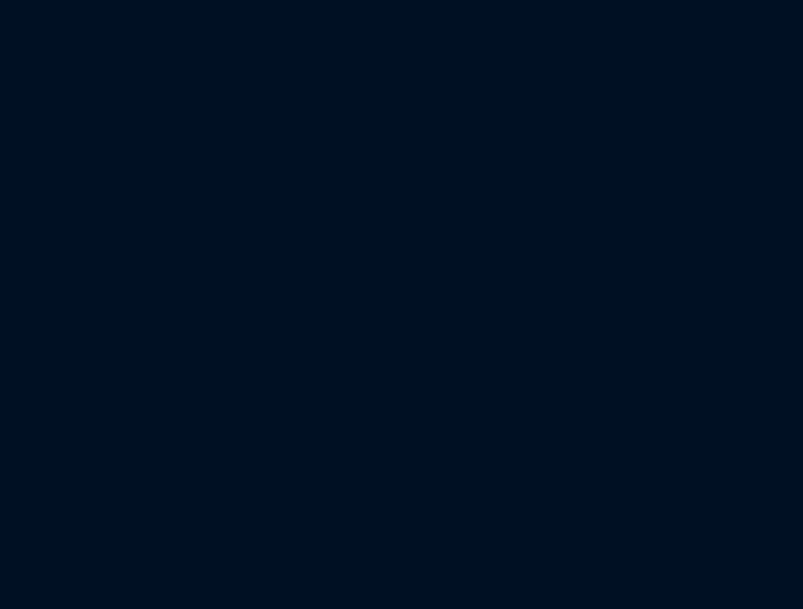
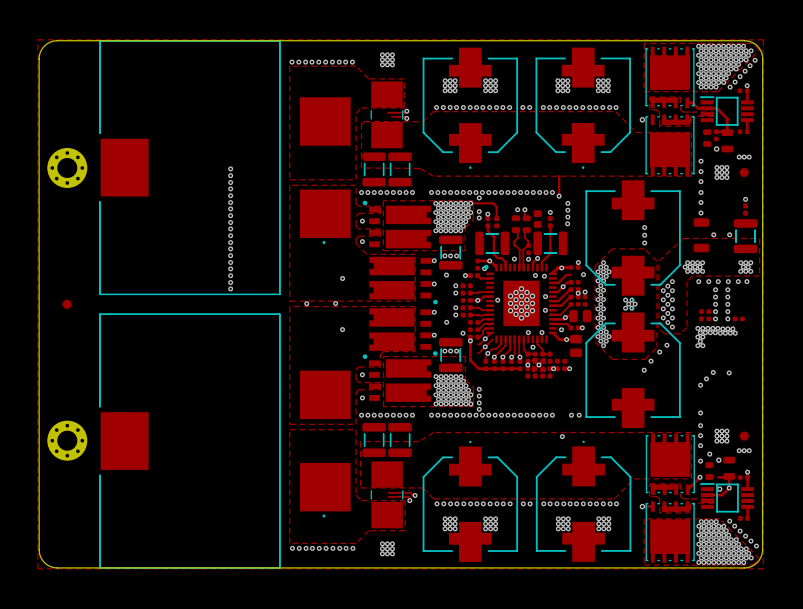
zone outline: none -> (37, 39) (37, 568) (763, 568) (763, 39) (37, 39)
board edge: none -> (57, 40) (744, 40) (755, 44) (760, 51) (762, 58) (762, 549) (758, 561) (752, 566) (744, 567) (57, 567) (46, 563) (40, 557) (39, 549) (39, 58) (44, 46) (57, 40)
zone outline: none -> (644, 43) (644, 91) (717, 91) (759, 49) (752, 43) (644, 43)
via: none -> (698, 46)
via: none -> (703, 46)
via: none -> (708, 46)
via: none -> (713, 46)
via: none -> (718, 46)
via: none -> (723, 46)
via: none -> (728, 46)
via: none -> (733, 46)
via: none -> (738, 46)
via: none -> (743, 46)
via: none -> (701, 50)
via: none -> (706, 50)
via: none -> (711, 50)
via: none -> (716, 50)
via: none -> (721, 50)
via: none -> (726, 50)
via: none -> (731, 50)
via: none -> (736, 50)
via: none -> (741, 50)
via: none -> (746, 50)
via: none -> (751, 50)
via: none -> (382, 54)
via: none -> (387, 54)
via: none -> (392, 54)
via: none -> (698, 55)
via: none -> (703, 55)
via: none -> (708, 55)
via: none -> (713, 55)
via: none -> (718, 55)
via: none -> (723, 55)
via: none -> (728, 55)
via: none -> (733, 55)
via: none -> (738, 55)
via: none -> (743, 55)
via: none -> (748, 55)
via: none -> (382, 59)
via: none -> (387, 59)
via: none -> (392, 59)
via: none -> (701, 59)
via: none -> (706, 59)
via: none -> (711, 59)
via: none -> (716, 59)
via: none -> (721, 59)
via: none -> (726, 59)
via: none -> (731, 59)
via: none -> (736, 59)
via: none -> (741, 59)
via: none -> (746, 59)
via: none -> (755, 60)
via: none -> (292, 62)
via: none -> (298, 62)
via: none -> (305, 62)
via: none -> (311, 62)
via: none -> (318, 62)
via: none -> (325, 62)
via: none -> (332, 62)
via: none -> (339, 62)
via: none -> (345, 62)
via: none -> (352, 62)
via: none -> (382, 64)
via: none -> (387, 64)
via: none -> (392, 64)
via: none -> (698, 64)
via: none -> (703, 64)
via: none -> (708, 64)
via: none -> (713, 64)
via: none -> (718, 64)
via: none -> (723, 64)
via: none -> (728, 64)
via: none -> (733, 64)
via: none -> (738, 64)
via: none -> (750, 65)
zone outline: none -> (289, 66) (289, 179) (356, 179) (356, 113) (361, 108) (404, 108) (404, 78) (368, 78) (356, 66) (289, 66)
via: none -> (701, 69)
via: none -> (706, 69)
via: none -> (711, 69)
via: none -> (716, 69)
via: none -> (721, 69)
via: none -> (726, 69)
via: none -> (731, 69)
via: none -> (736, 69)
via: none -> (745, 71)
via: none -> (698, 73)
via: none -> (703, 73)
via: none -> (708, 73)
via: none -> (713, 73)
via: none -> (718, 73)
via: none -> (723, 73)
via: none -> (728, 73)
via: none -> (740, 76)
part: none -> (669, 77)
via: none -> (701, 78)
via: none -> (706, 78)
via: none -> (711, 78)
via: none -> (716, 78)
via: none -> (721, 78)
via: none -> (726, 78)
via: none -> (445, 80)
via: none -> (450, 80)
via: none -> (455, 80)
via: none -> (485, 80)
via: none -> (490, 80)
via: none -> (495, 80)
via: none -> (557, 80)
via: none -> (562, 80)
via: none -> (567, 80)
via: none -> (598, 80)
via: none -> (603, 80)
via: none -> (608, 80)
via: none -> (698, 82)
via: none -> (703, 82)
via: none -> (708, 82)
via: none -> (713, 82)
via: none -> (718, 82)
via: none -> (723, 82)
via: none -> (735, 82)
via: none -> (445, 85)
via: none -> (450, 85)
via: none -> (455, 85)
via: none -> (485, 85)
via: none -> (490, 85)
via: none -> (495, 85)
via: none -> (557, 85)
via: none -> (562, 85)
via: none -> (567, 85)
via: none -> (598, 85)
via: none -> (603, 85)
via: none -> (608, 85)
via: none -> (747, 85)
via: none -> (701, 87)
via: none -> (706, 87)
via: none -> (711, 87)
via: none -> (716, 87)
via: none -> (730, 87)
via: none -> (445, 90)
via: none -> (450, 90)
via: none -> (455, 90)
via: none -> (485, 90)
via: none -> (490, 90)
via: none -> (495, 90)
via: none -> (557, 90)
via: none -> (562, 90)
via: none -> (567, 90)
via: none -> (598, 90)
via: none -> (603, 90)
via: none -> (608, 90)
part: none -> (743, 90)
track: none -> (747, 90) (747, 102)
zone outline: none -> (649, 97) (680, 97) (680, 109) (683, 112) (713, 112) (713, 116) (691, 116) (690, 126) (659, 126) (659, 112) (656, 109) (649, 109) (649, 97)
track: none -> (687, 102) (692, 102) (698, 108) (716, 108) (727, 118) (727, 132) (716, 131)
via: none -> (436, 107)
via: none -> (443, 107)
via: none -> (450, 107)
via: none -> (456, 107)
via: none -> (463, 107)
via: none -> (470, 107)
via: none -> (476, 107)
via: none -> (482, 107)
via: none -> (489, 107)
via: none -> (496, 107)
via: none -> (502, 107)
via: none -> (509, 107)
via: none -> (522, 107)
via: none -> (529, 107)
via: none -> (543, 107)
via: none -> (549, 107)
via: none -> (556, 107)
via: none -> (563, 107)
via: none -> (569, 107)
via: none -> (576, 107)
via: none -> (582, 107)
via: none -> (589, 107)
via: none -> (596, 107)
via: none -> (602, 107)
via: none -> (609, 107)
via: none -> (616, 107)
part: none -> (470, 108)
part: none -> (583, 108)
track: none -> (406, 111) (391, 112)
via: none -> (406, 111)
zone outline: none -> (433, 111) (423, 121) (364, 121) (361, 124) (361, 167) (419, 168) (433, 176) (691, 176) (691, 132) (636, 132) (615, 111) (433, 111)
part: none -> (726, 111)
part: none -> (390, 112)
part: none -> (386, 114)
track: none -> (391, 116) (406, 118)
via: none -> (406, 118)
via: none -> (642, 119)
track: none -> (747, 120) (747, 131)
part: none -> (743, 131)
part: none -> (716, 135)
part: none -> (707, 138)
part: none -> (727, 140)
part: none -> (669, 145)
via: none -> (716, 148)
via: none -> (739, 157)
via: none -> (744, 157)
via: none -> (749, 157)
via: none -> (701, 161)
part: none -> (67, 167)
part: none -> (225, 167)
via: none -> (716, 167)
via: none -> (721, 167)
via: none -> (726, 167)
via: none -> (230, 168)
part: none -> (374, 169)
part: none -> (400, 169)
via: none -> (701, 171)
via: none -> (716, 172)
via: none -> (721, 172)
via: none -> (726, 172)
part: none -> (744, 172)
via: none -> (230, 175)
track: none -> (559, 176) (559, 196)
via: none -> (716, 177)
via: none -> (721, 177)
via: none -> (726, 177)
via: none -> (701, 181)
via: none -> (230, 182)
zone outline: none -> (289, 185) (289, 301) (415, 301) (415, 254) (366, 254) (356, 243) (356, 238) (358, 236) (380, 236) (380, 228) (358, 228) (356, 226) (356, 216) (358, 213) (380, 213) (380, 206) (358, 206) (356, 203) (356, 185) (289, 185)
via: none -> (230, 188)
via: none -> (361, 192)
via: none -> (367, 192)
via: none -> (374, 192)
via: none -> (380, 192)
via: none -> (386, 192)
via: none -> (393, 192)
via: none -> (399, 192)
via: none -> (406, 192)
via: none -> (412, 192)
via: none -> (431, 192)
via: none -> (437, 192)
via: none -> (444, 192)
via: none -> (450, 192)
via: none -> (456, 192)
via: none -> (463, 192)
via: none -> (469, 192)
via: none -> (476, 192)
via: none -> (482, 192)
via: none -> (488, 192)
via: none -> (495, 192)
via: none -> (501, 192)
via: none -> (507, 192)
via: none -> (514, 192)
via: none -> (520, 192)
via: none -> (526, 192)
via: none -> (533, 192)
via: none -> (539, 192)
via: none -> (546, 192)
via: none -> (552, 192)
via: none -> (701, 192)
via: none -> (230, 195)
via: none -> (559, 196)
via: none -> (479, 197)
via: none -> (745, 199)
zone outline: none -> (383, 200) (473, 200) (473, 219) (465, 227) (465, 250) (383, 250) (383, 200)
via: none -> (230, 202)
via: none -> (701, 202)
via: none -> (435, 203)
via: none -> (440, 203)
via: none -> (445, 203)
via: none -> (450, 203)
via: none -> (455, 203)
via: none -> (460, 203)
via: none -> (465, 203)
track: none -> (470, 203) (493, 203) (496, 206) (496, 218)
via: none -> (470, 203)
via: none -> (567, 203)
via: none -> (438, 207)
via: none -> (443, 207)
via: none -> (448, 207)
via: none -> (453, 207)
via: none -> (458, 207)
via: none -> (463, 207)
via: none -> (468, 207)
via: none -> (230, 208)
via: none -> (517, 209)
track: none -> (524, 209) (526, 218)
via: none -> (524, 209)
part: none -> (745, 209)
via: none -> (567, 210)
via: none -> (479, 211)
via: none -> (435, 212)
via: none -> (440, 212)
via: none -> (445, 212)
via: none -> (450, 212)
via: none -> (455, 212)
via: none -> (460, 212)
via: none -> (465, 212)
via: none -> (470, 212)
via: none -> (550, 212)
via: none -> (701, 212)
via: none -> (487, 214)
via: none -> (230, 215)
via: none -> (438, 217)
via: none -> (443, 217)
via: none -> (448, 217)
via: none -> (453, 217)
via: none -> (458, 217)
via: none -> (463, 217)
via: none -> (468, 217)
via: none -> (479, 217)
via: none -> (567, 217)
part: none -> (537, 219)
via: none -> (362, 221)
via: none -> (435, 221)
via: none -> (440, 221)
via: none -> (445, 221)
via: none -> (450, 221)
via: none -> (455, 221)
via: none -> (460, 221)
via: none -> (465, 221)
via: none -> (230, 222)
part: none -> (487, 222)
part: none -> (496, 222)
part: none -> (550, 222)
via: none -> (567, 223)
part: none -> (396, 224)
part: none -> (515, 224)
part: none -> (526, 224)
track: none -> (487, 225) (487, 230) (493, 236) (493, 254) (505, 262) (505, 267)
track: none -> (550, 225) (550, 253) (541, 262) (541, 267)
via: none -> (438, 226)
via: none -> (443, 226)
via: none -> (448, 226)
via: none -> (453, 226)
via: none -> (458, 226)
via: none -> (463, 226)
via: none -> (644, 227)
via: none -> (230, 228)
via: none -> (435, 230)
via: none -> (440, 230)
via: none -> (445, 230)
via: none -> (450, 230)
via: none -> (455, 230)
via: none -> (460, 230)
track: none -> (515, 230) (517, 238) (514, 241) (514, 245) (519, 249) (519, 267)
track: none -> (526, 230) (525, 238) (528, 241) (528, 245)
via: none -> (713, 234)
via: none -> (729, 234)
via: none -> (230, 235)
via: none -> (644, 235)
part: none -> (701, 235)
part: none -> (745, 236)
zone outline: none -> (683, 238) (658, 261) (658, 328) (664, 333) (680, 333) (686, 327) (686, 281) (692, 276) (759, 275) (759, 238) (683, 238)
part: none -> (633, 240)
via: none -> (362, 241)
via: none -> (230, 242)
via: none -> (644, 242)
part: none -> (492, 243)
part: none -> (550, 243)
track: none -> (528, 245) (523, 249) (523, 267)
via: none -> (230, 248)
zone outline: none -> (612, 248) (644, 248) (656, 261) (656, 347) (645, 359) (612, 359) (595, 342) (595, 266) (612, 248)
part: none -> (528, 249)
part: none -> (450, 252)
via: none -> (230, 255)
via: none -> (444, 255)
via: none -> (450, 255)
via: none -> (456, 255)
track: none -> (537, 257) (532, 262) (532, 267)
via: none -> (537, 258)
via: none -> (514, 259)
via: none -> (528, 259)
via: none -> (434, 260)
track: none -> (477, 260) (489, 260) (496, 267)
via: none -> (489, 260)
via: none -> (230, 262)
via: none -> (578, 262)
via: none -> (603, 262)
via: none -> (687, 262)
via: none -> (692, 262)
via: none -> (697, 262)
via: none -> (702, 262)
via: none -> (740, 262)
via: none -> (745, 262)
via: none -> (750, 262)
part: none -> (477, 264)
via: none -> (561, 267)
track: none -> (570, 267) (557, 267) (552, 273)
part: none -> (574, 267)
via: none -> (600, 267)
via: none -> (606, 267)
via: none -> (685, 267)
via: none -> (690, 267)
via: none -> (695, 267)
via: none -> (700, 267)
via: none -> (743, 267)
via: none -> (748, 267)
via: none -> (230, 268)
via: none -> (484, 268)
via: none -> (598, 271)
via: none -> (603, 271)
via: none -> (608, 271)
via: none -> (687, 271)
via: none -> (692, 271)
via: none -> (697, 271)
via: none -> (702, 271)
via: none -> (740, 271)
via: none -> (745, 271)
via: none -> (750, 271)
track: none -> (570, 274) (566, 274) (558, 282) (552, 282)
via: none -> (583, 274)
via: none -> (230, 275)
via: none -> (446, 275)
via: none -> (465, 275)
part: none -> (474, 275)
track: none -> (477, 275) (480, 278) (490, 278)
via: none -> (535, 275)
via: none -> (544, 276)
via: none -> (600, 276)
via: none -> (606, 276)
via: none -> (342, 278)
part: none -> (403, 280)
via: none -> (598, 280)
via: none -> (603, 280)
via: none -> (672, 281)
via: none -> (698, 281)
via: none -> (708, 281)
via: none -> (718, 281)
via: none -> (728, 281)
via: none -> (738, 281)
via: none -> (746, 281)
via: none -> (230, 282)
track: none -> (570, 282) (567, 282) (557, 292) (552, 292)
part: none -> (574, 282)
via: none -> (434, 283)
via: none -> (455, 285)
part: none -> (466, 285)
via: none -> (600, 285)
via: none -> (563, 286)
via: none -> (667, 286)
via: none -> (230, 288)
via: none -> (521, 288)
track: none -> (570, 289) (558, 301) (552, 301)
part: none -> (574, 289)
via: none -> (715, 289)
via: none -> (727, 289)
via: none -> (598, 290)
via: none -> (603, 290)
via: none -> (663, 290)
via: none -> (672, 290)
track: none -> (490, 292) (470, 293)
via: none -> (516, 292)
via: none -> (526, 292)
via: none -> (585, 292)
via: none -> (455, 293)
part: none -> (466, 293)
via: none -> (578, 293)
via: none -> (600, 295)
via: none -> (667, 295)
track: none -> (490, 296) (483, 296) (480, 300) (470, 300)
via: none -> (510, 296)
via: none -> (521, 296)
via: none -> (532, 296)
via: none -> (545, 296)
track: none -> (570, 296) (561, 305) (552, 305)
part: none -> (574, 296)
via: none -> (715, 297)
via: none -> (727, 297)
via: none -> (516, 299)
via: none -> (526, 299)
via: none -> (598, 299)
via: none -> (603, 299)
via: none -> (663, 299)
via: none -> (672, 299)
part: none -> (466, 300)
via: none -> (477, 300)
via: none -> (497, 300)
part: none -> (585, 300)
via: none -> (625, 300)
via: none -> (631, 300)
via: none -> (306, 303)
via: none -> (335, 303)
via: none -> (510, 303)
part: none -> (520, 303)
via: none -> (521, 303)
via: none -> (532, 303)
part: none -> (67, 304)
track: none -> (570, 304) (560, 314) (552, 314)
part: none -> (574, 304)
via: none -> (600, 304)
via: none -> (628, 304)
via: none -> (635, 304)
via: none -> (667, 304)
via: none -> (715, 304)
via: none -> (727, 304)
zone outline: none -> (289, 306) (289, 424) (356, 424) (356, 392) (358, 389) (380, 389) (380, 382) (358, 382) (356, 379) (356, 369) (358, 367) (380, 367) (380, 354) (383, 351) (415, 351) (415, 306) (289, 306)
via: none -> (455, 307)
part: none -> (466, 307)
track: none -> (470, 307) (490, 310)
via: none -> (516, 307)
via: none -> (526, 307)
via: none -> (598, 308)
via: none -> (603, 308)
via: none -> (625, 308)
via: none -> (631, 308)
via: none -> (663, 308)
via: none -> (672, 308)
via: none -> (510, 310)
via: none -> (521, 310)
via: none -> (532, 310)
via: none -> (545, 310)
part: none -> (705, 311)
via: none -> (715, 311)
via: none -> (727, 311)
via: none -> (434, 312)
via: none -> (600, 313)
via: none -> (667, 313)
track: none -> (490, 314) (470, 315)
via: none -> (516, 314)
via: none -> (526, 314)
via: none -> (455, 315)
part: none -> (466, 315)
part: none -> (580, 316)
via: none -> (521, 317)
via: none -> (565, 317)
via: none -> (663, 317)
via: none -> (672, 317)
track: none -> (571, 318) (573, 316) (566, 316) (563, 319) (552, 319)
via: none -> (598, 318)
via: none -> (603, 318)
part: none -> (705, 318)
via: none -> (715, 318)
via: none -> (727, 318)
part: none -> (738, 318)
track: none -> (490, 319) (483, 319) (477, 322)
via: none -> (446, 322)
part: none -> (474, 322)
via: none -> (600, 322)
via: none -> (667, 322)
track: none -> (490, 323) (484, 323) (477, 329)
track: none -> (552, 323) (567, 324) (570, 327)
part: none -> (574, 327)
via: none -> (582, 327)
via: none -> (598, 327)
via: none -> (603, 327)
via: none -> (672, 327)
track: none -> (490, 328) (485, 328) (483, 333) (477, 337)
via: none -> (697, 328)
via: none -> (702, 328)
via: none -> (707, 328)
via: none -> (712, 328)
via: none -> (717, 328)
via: none -> (722, 328)
via: none -> (727, 328)
via: none -> (732, 328)
via: none -> (342, 329)
part: none -> (474, 329)
via: none -> (561, 329)
part: none -> (403, 331)
track: none -> (490, 332) (477, 344)
via: none -> (528, 332)
via: none -> (541, 332)
track: none -> (552, 332) (559, 339) (576, 339)
via: none -> (600, 332)
via: none -> (606, 332)
via: none -> (700, 332)
via: none -> (705, 332)
via: none -> (710, 332)
via: none -> (715, 332)
via: none -> (462, 333)
via: none -> (720, 333)
via: none -> (725, 333)
via: none -> (730, 333)
via: none -> (735, 333)
via: none -> (434, 335)
via: none -> (598, 336)
via: none -> (603, 336)
via: none -> (608, 336)
track: none -> (470, 337) (470, 360) (478, 368) (519, 368)
part: none -> (474, 337)
via: none -> (697, 337)
via: none -> (702, 337)
via: none -> (485, 338)
track: none -> (492, 339) (480, 351)
track: none -> (501, 339) (501, 344) (485, 355) (485, 361)
track: none -> (505, 339) (505, 345) (494, 357) (494, 361)
track: none -> (510, 339) (510, 349) (502, 357) (502, 361)
track: none -> (514, 339) (514, 354) (511, 357) (511, 361)
track: none -> (519, 339) (519, 361)
track: none -> (523, 339) (523, 349) (527, 354) (535, 354)
track: none -> (537, 339) (537, 344) (542, 349) (542, 354) (550, 354)
via: none -> (566, 339)
via: none -> (470, 340)
via: none -> (600, 341)
via: none -> (606, 341)
via: none -> (700, 341)
part: none -> (576, 345)
via: none -> (603, 345)
via: none -> (666, 345)
via: none -> (697, 345)
via: none -> (702, 345)
via: none -> (485, 346)
via: none -> (532, 347)
via: none -> (444, 351)
via: none -> (450, 351)
via: none -> (456, 351)
via: none -> (659, 352)
track: none -> (477, 353) (479, 353)
via: none -> (487, 353)
part: none -> (450, 355)
zone outline: none -> (383, 356) (465, 356) (465, 379) (473, 387) (473, 406) (383, 406) (383, 356)
via: none -> (494, 357)
via: none -> (502, 357)
via: none -> (511, 357)
via: none -> (519, 357)
part: none -> (527, 357)
part: none -> (535, 357)
part: none -> (542, 357)
part: none -> (550, 357)
zone outline: none -> (532, 358) (545, 358) (545, 371) (532, 371) (532, 358)
part: none -> (561, 361)
via: none -> (651, 361)
via: none -> (538, 364)
part: none -> (485, 365)
part: none -> (494, 365)
part: none -> (502, 365)
part: none -> (511, 365)
part: none -> (519, 365)
via: none -> (527, 365)
part: none -> (633, 367)
via: none -> (553, 368)
part: none -> (561, 368)
via: none -> (569, 368)
via: none -> (644, 370)
part: none -> (527, 372)
part: none -> (535, 372)
part: none -> (542, 372)
part: none -> (549, 372)
via: none -> (713, 372)
via: none -> (729, 372)
via: none -> (362, 374)
via: none -> (436, 376)
via: none -> (441, 376)
via: none -> (446, 376)
via: none -> (451, 376)
via: none -> (456, 376)
via: none -> (460, 376)
part: none -> (396, 378)
via: none -> (706, 378)
via: none -> (438, 381)
via: none -> (443, 381)
via: none -> (448, 381)
via: none -> (453, 381)
via: none -> (458, 381)
via: none -> (463, 381)
via: none -> (436, 385)
via: none -> (441, 385)
via: none -> (446, 385)
via: none -> (451, 385)
via: none -> (456, 385)
via: none -> (460, 385)
via: none -> (465, 385)
via: none -> (700, 385)
via: none -> (479, 389)
via: none -> (438, 390)
via: none -> (443, 390)
via: none -> (448, 390)
via: none -> (453, 390)
via: none -> (458, 390)
via: none -> (463, 390)
via: none -> (468, 390)
via: none -> (435, 394)
via: none -> (441, 394)
via: none -> (446, 394)
via: none -> (451, 394)
via: none -> (456, 394)
via: none -> (460, 394)
via: none -> (465, 394)
via: none -> (470, 394)
via: none -> (479, 396)
via: none -> (362, 397)
via: none -> (438, 399)
via: none -> (443, 399)
via: none -> (448, 399)
via: none -> (453, 399)
via: none -> (458, 399)
via: none -> (463, 399)
via: none -> (468, 399)
via: none -> (479, 402)
via: none -> (436, 403)
via: none -> (441, 403)
via: none -> (446, 403)
via: none -> (451, 403)
via: none -> (456, 403)
via: none -> (460, 404)
via: none -> (465, 404)
via: none -> (470, 404)
via: none -> (479, 409)
via: none -> (700, 412)
via: none -> (361, 415)
via: none -> (367, 415)
via: none -> (374, 415)
via: none -> (380, 415)
via: none -> (386, 415)
via: none -> (393, 415)
via: none -> (399, 415)
via: none -> (406, 415)
via: none -> (412, 415)
via: none -> (431, 415)
via: none -> (437, 415)
via: none -> (444, 415)
via: none -> (450, 415)
via: none -> (456, 415)
via: none -> (463, 415)
via: none -> (469, 415)
via: none -> (476, 415)
via: none -> (482, 415)
via: none -> (488, 415)
via: none -> (495, 415)
via: none -> (501, 415)
via: none -> (507, 415)
via: none -> (514, 415)
via: none -> (520, 415)
via: none -> (526, 415)
via: none -> (533, 415)
via: none -> (539, 415)
via: none -> (546, 415)
via: none -> (552, 415)
via: none -> (571, 415)
via: none -> (579, 415)
via: none -> (700, 425)
zone outline: none -> (289, 429) (289, 543) (356, 543) (368, 530) (405, 530) (405, 500) (361, 500) (356, 495) (356, 429) (289, 429)
via: none -> (716, 431)
via: none -> (721, 431)
via: none -> (726, 431)
zone outline: none -> (433, 432) (691, 432) (691, 478) (634, 478) (614, 498) (433, 498) (422, 487) (360, 487) (360, 441) (418, 441) (433, 432)
via: none -> (700, 435)
via: none -> (562, 436)
via: none -> (716, 436)
via: none -> (721, 436)
via: none -> (726, 436)
part: none -> (744, 436)
part: none -> (67, 440)
part: none -> (374, 440)
part: none -> (400, 440)
part: none -> (225, 441)
via: none -> (716, 441)
via: none -> (721, 441)
via: none -> (726, 441)
via: none -> (700, 445)
via: none -> (739, 450)
via: none -> (744, 450)
via: none -> (749, 450)
via: none -> (709, 454)
via: none -> (718, 460)
via: none -> (700, 461)
part: none -> (670, 464)
part: none -> (729, 468)
part: none -> (709, 471)
via: none -> (747, 472)
track: none -> (700, 477) (687, 489)
via: none -> (700, 477)
track: none -> (718, 477) (729, 476) (729, 488) (722, 495) (707, 495)
part: none -> (743, 477)
zone outline: none -> (649, 483) (649, 496) (656, 496) (659, 499) (659, 512) (690, 512) (691, 503) (713, 503) (713, 498) (683, 498) (680, 496) (680, 483) (649, 483)
via: none -> (729, 488)
via: none -> (719, 489)
part: none -> (390, 492)
track: none -> (392, 492) (410, 492) (415, 495)
part: none -> (387, 494)
via: none -> (415, 495)
part: none -> (390, 496)
track: none -> (392, 496) (408, 496) (409, 500)
part: none -> (727, 497)
via: none -> (409, 500)
part: none -> (470, 501)
part: none -> (583, 501)
via: none -> (436, 503)
via: none -> (443, 503)
via: none -> (450, 503)
via: none -> (456, 503)
via: none -> (463, 503)
via: none -> (470, 503)
via: none -> (476, 503)
via: none -> (483, 503)
via: none -> (490, 503)
via: none -> (496, 503)
via: none -> (503, 503)
via: none -> (510, 503)
via: none -> (523, 503)
via: none -> (530, 503)
via: none -> (543, 503)
via: none -> (550, 503)
via: none -> (556, 503)
via: none -> (563, 503)
via: none -> (570, 503)
via: none -> (576, 503)
via: none -> (583, 503)
via: none -> (590, 503)
via: none -> (596, 503)
via: none -> (603, 503)
via: none -> (610, 503)
via: none -> (616, 503)
track: none -> (642, 506) (652, 506)
via: none -> (642, 506)
track: none -> (747, 506) (747, 518)
via: none -> (445, 518)
via: none -> (450, 518)
via: none -> (455, 518)
via: none -> (485, 518)
via: none -> (490, 518)
via: none -> (495, 518)
via: none -> (558, 518)
via: none -> (563, 518)
via: none -> (568, 518)
via: none -> (598, 518)
via: none -> (603, 518)
via: none -> (608, 518)
zone outline: none -> (644, 518) (719, 518) (759, 558) (752, 565) (644, 565) (644, 518)
part: none -> (743, 518)
via: none -> (701, 521)
via: none -> (706, 521)
via: none -> (711, 521)
via: none -> (716, 521)
via: none -> (729, 521)
via: none -> (445, 523)
via: none -> (450, 523)
via: none -> (455, 523)
via: none -> (485, 523)
via: none -> (490, 523)
via: none -> (495, 523)
via: none -> (558, 523)
via: none -> (563, 523)
via: none -> (568, 523)
via: none -> (598, 523)
via: none -> (603, 523)
via: none -> (608, 523)
via: none -> (698, 526)
via: none -> (703, 526)
via: none -> (708, 526)
via: none -> (713, 526)
via: none -> (718, 526)
via: none -> (723, 526)
via: none -> (734, 526)
via: none -> (445, 528)
via: none -> (450, 528)
via: none -> (455, 528)
via: none -> (485, 528)
via: none -> (490, 528)
via: none -> (495, 528)
via: none -> (558, 528)
via: none -> (563, 528)
via: none -> (568, 528)
via: none -> (598, 528)
via: none -> (603, 528)
via: none -> (608, 528)
via: none -> (701, 530)
via: none -> (706, 530)
via: none -> (711, 530)
via: none -> (716, 530)
via: none -> (721, 530)
via: none -> (726, 530)
via: none -> (740, 531)
part: none -> (670, 532)
via: none -> (698, 535)
via: none -> (703, 535)
via: none -> (708, 535)
via: none -> (713, 535)
via: none -> (718, 535)
via: none -> (723, 535)
via: none -> (728, 535)
via: none -> (745, 536)
via: none -> (701, 539)
via: none -> (706, 539)
via: none -> (711, 539)
via: none -> (716, 539)
via: none -> (721, 539)
via: none -> (726, 539)
via: none -> (731, 539)
via: none -> (736, 539)
via: none -> (751, 541)
via: none -> (382, 543)
via: none -> (387, 543)
via: none -> (392, 543)
via: none -> (698, 544)
via: none -> (703, 544)
via: none -> (708, 544)
via: none -> (713, 544)
via: none -> (718, 544)
via: none -> (723, 544)
via: none -> (728, 544)
via: none -> (733, 544)
via: none -> (738, 544)
via: none -> (756, 546)
via: none -> (292, 548)
via: none -> (299, 548)
via: none -> (306, 548)
via: none -> (312, 548)
via: none -> (319, 548)
via: none -> (326, 548)
via: none -> (332, 548)
via: none -> (339, 548)
via: none -> (346, 548)
via: none -> (352, 548)
via: none -> (382, 548)
via: none -> (387, 548)
via: none -> (392, 548)
via: none -> (701, 548)
via: none -> (706, 548)
via: none -> (711, 548)
via: none -> (716, 548)
via: none -> (721, 548)
via: none -> (726, 548)
via: none -> (731, 548)
via: none -> (736, 548)
via: none -> (741, 548)
via: none -> (746, 548)
via: none -> (382, 553)
via: none -> (387, 553)
via: none -> (392, 553)
via: none -> (698, 553)
via: none -> (703, 553)
via: none -> (708, 553)
via: none -> (713, 553)
via: none -> (718, 553)
via: none -> (723, 553)
via: none -> (728, 553)
via: none -> (733, 553)
via: none -> (738, 553)
via: none -> (743, 553)
via: none -> (748, 553)
via: none -> (701, 557)
via: none -> (706, 557)
via: none -> (711, 557)
via: none -> (716, 557)
via: none -> (721, 557)
via: none -> (726, 557)
via: none -> (731, 557)
via: none -> (736, 557)
via: none -> (741, 557)
via: none -> (746, 557)
via: none -> (751, 557)
via: none -> (698, 562)
via: none -> (703, 562)
via: none -> (708, 562)
via: none -> (713, 562)
via: none -> (718, 562)
via: none -> (723, 562)
via: none -> (728, 562)
via: none -> (733, 562)
via: none -> (738, 562)
via: none -> (743, 562)

